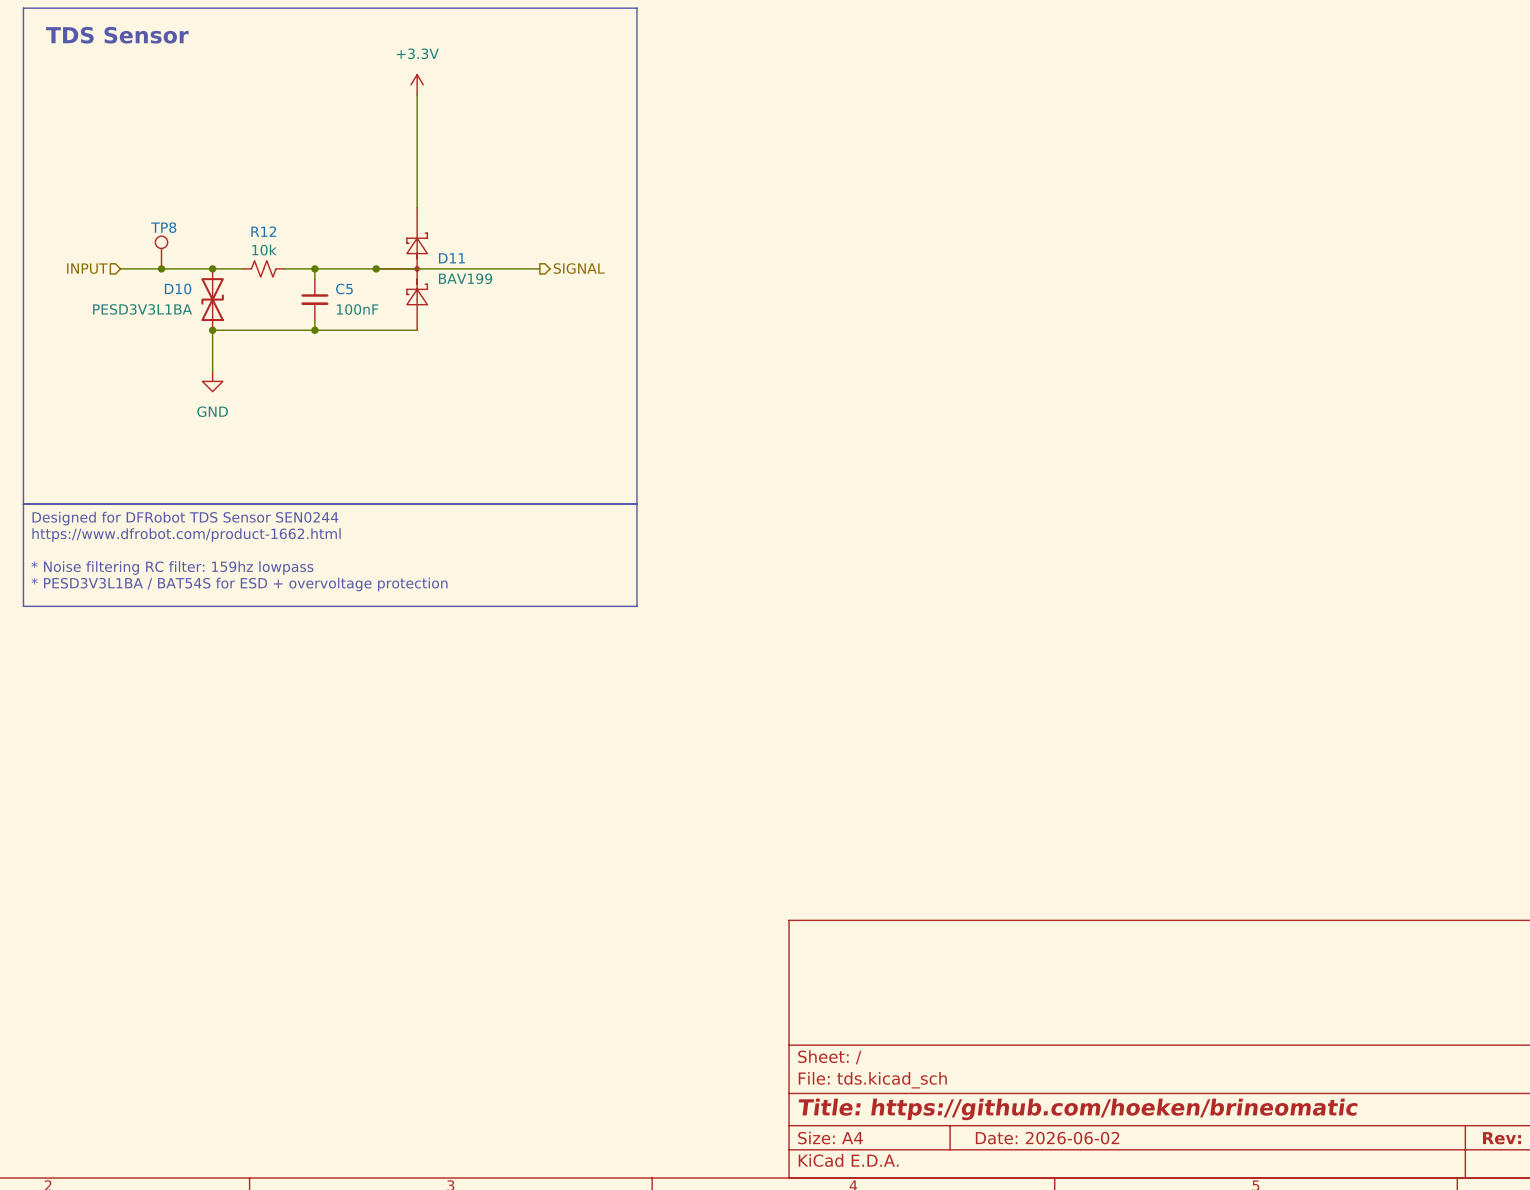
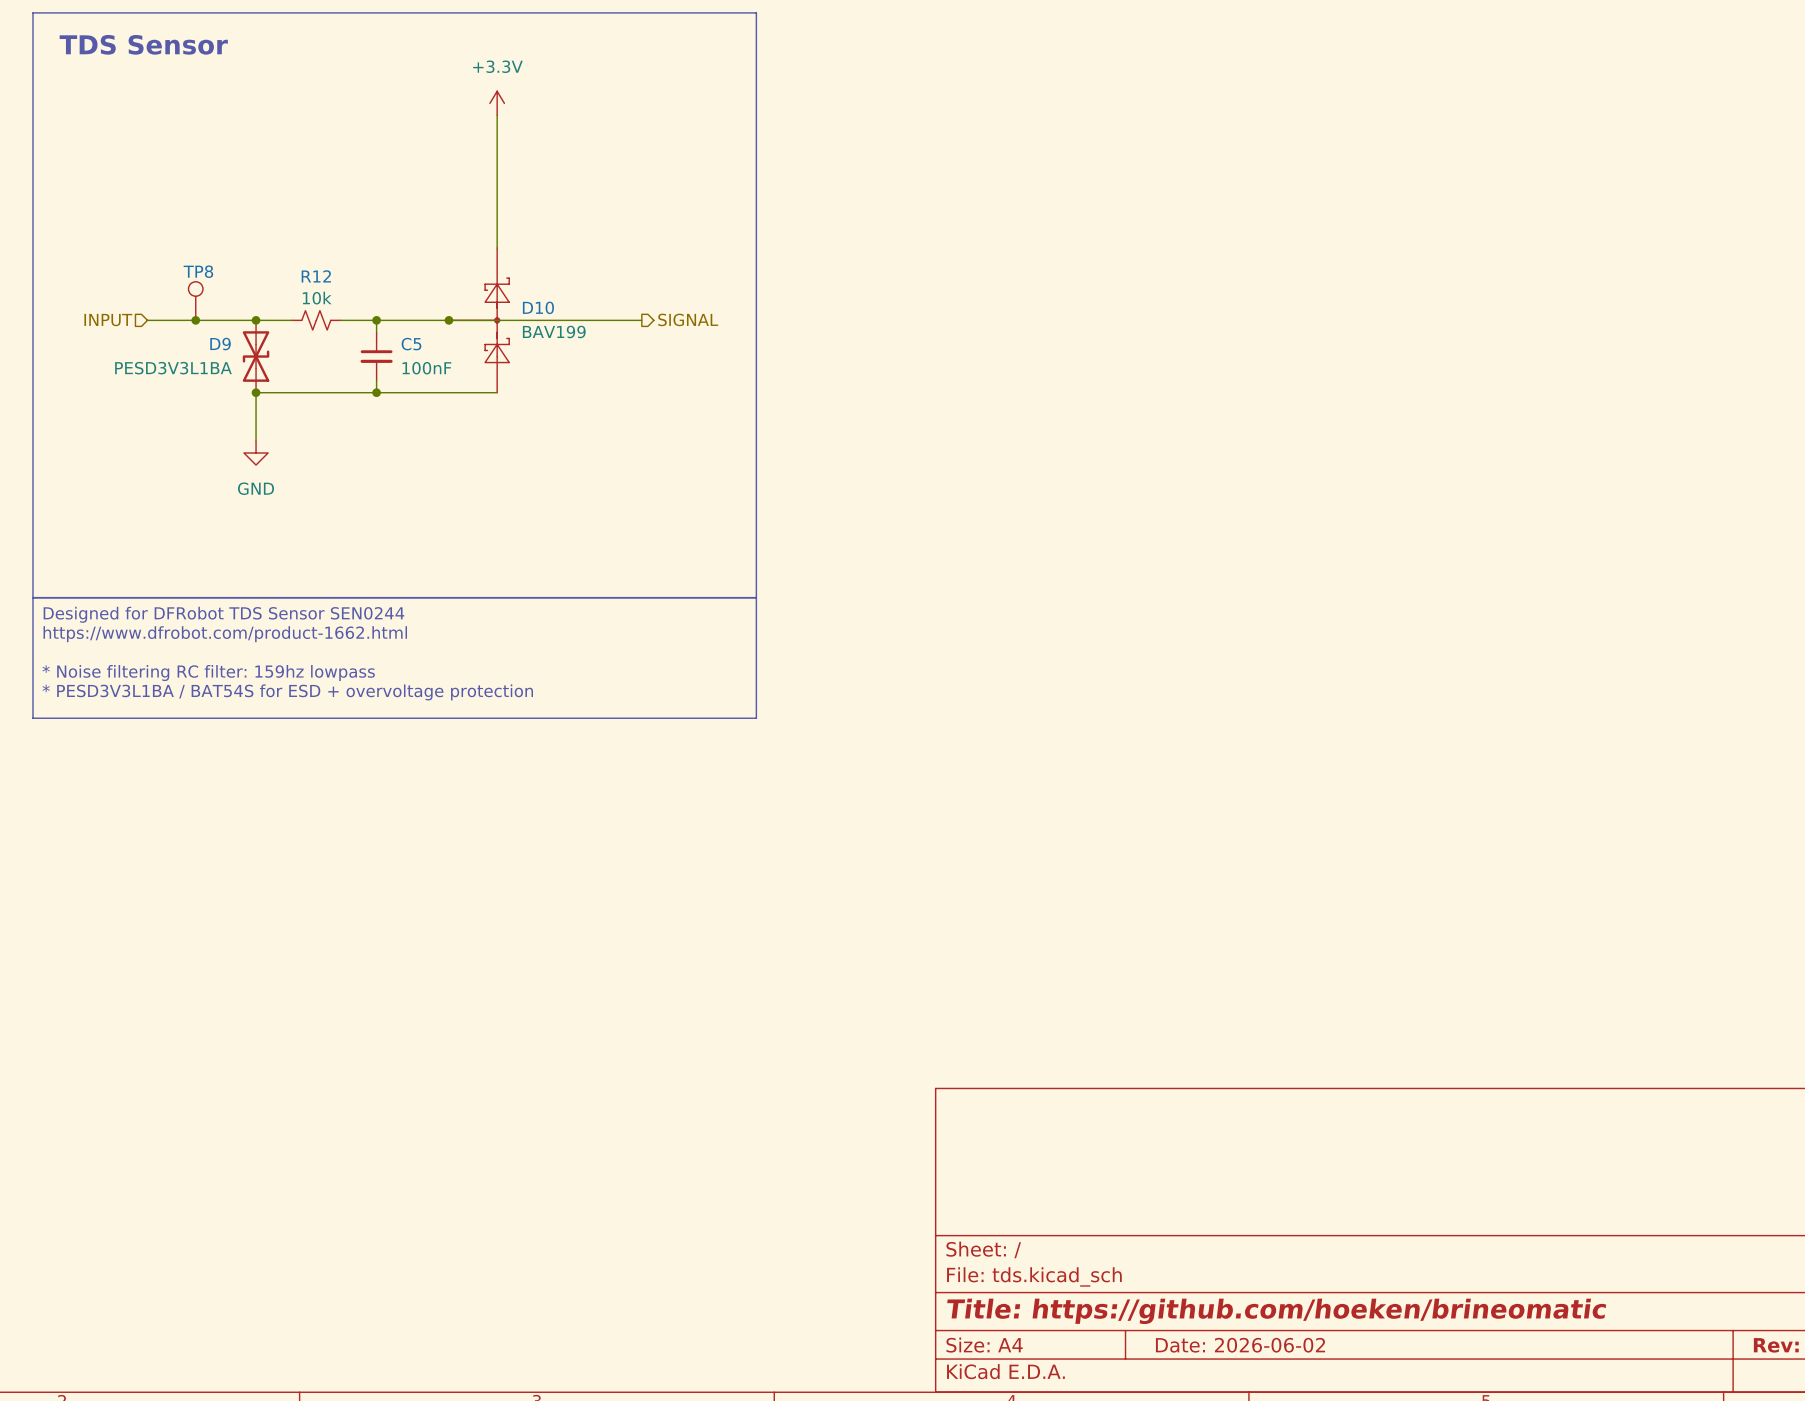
D11 name: D11 (451, 258) -> D10 (538, 307)
D10 name: D10 (178, 288) -> D9 (220, 344)

